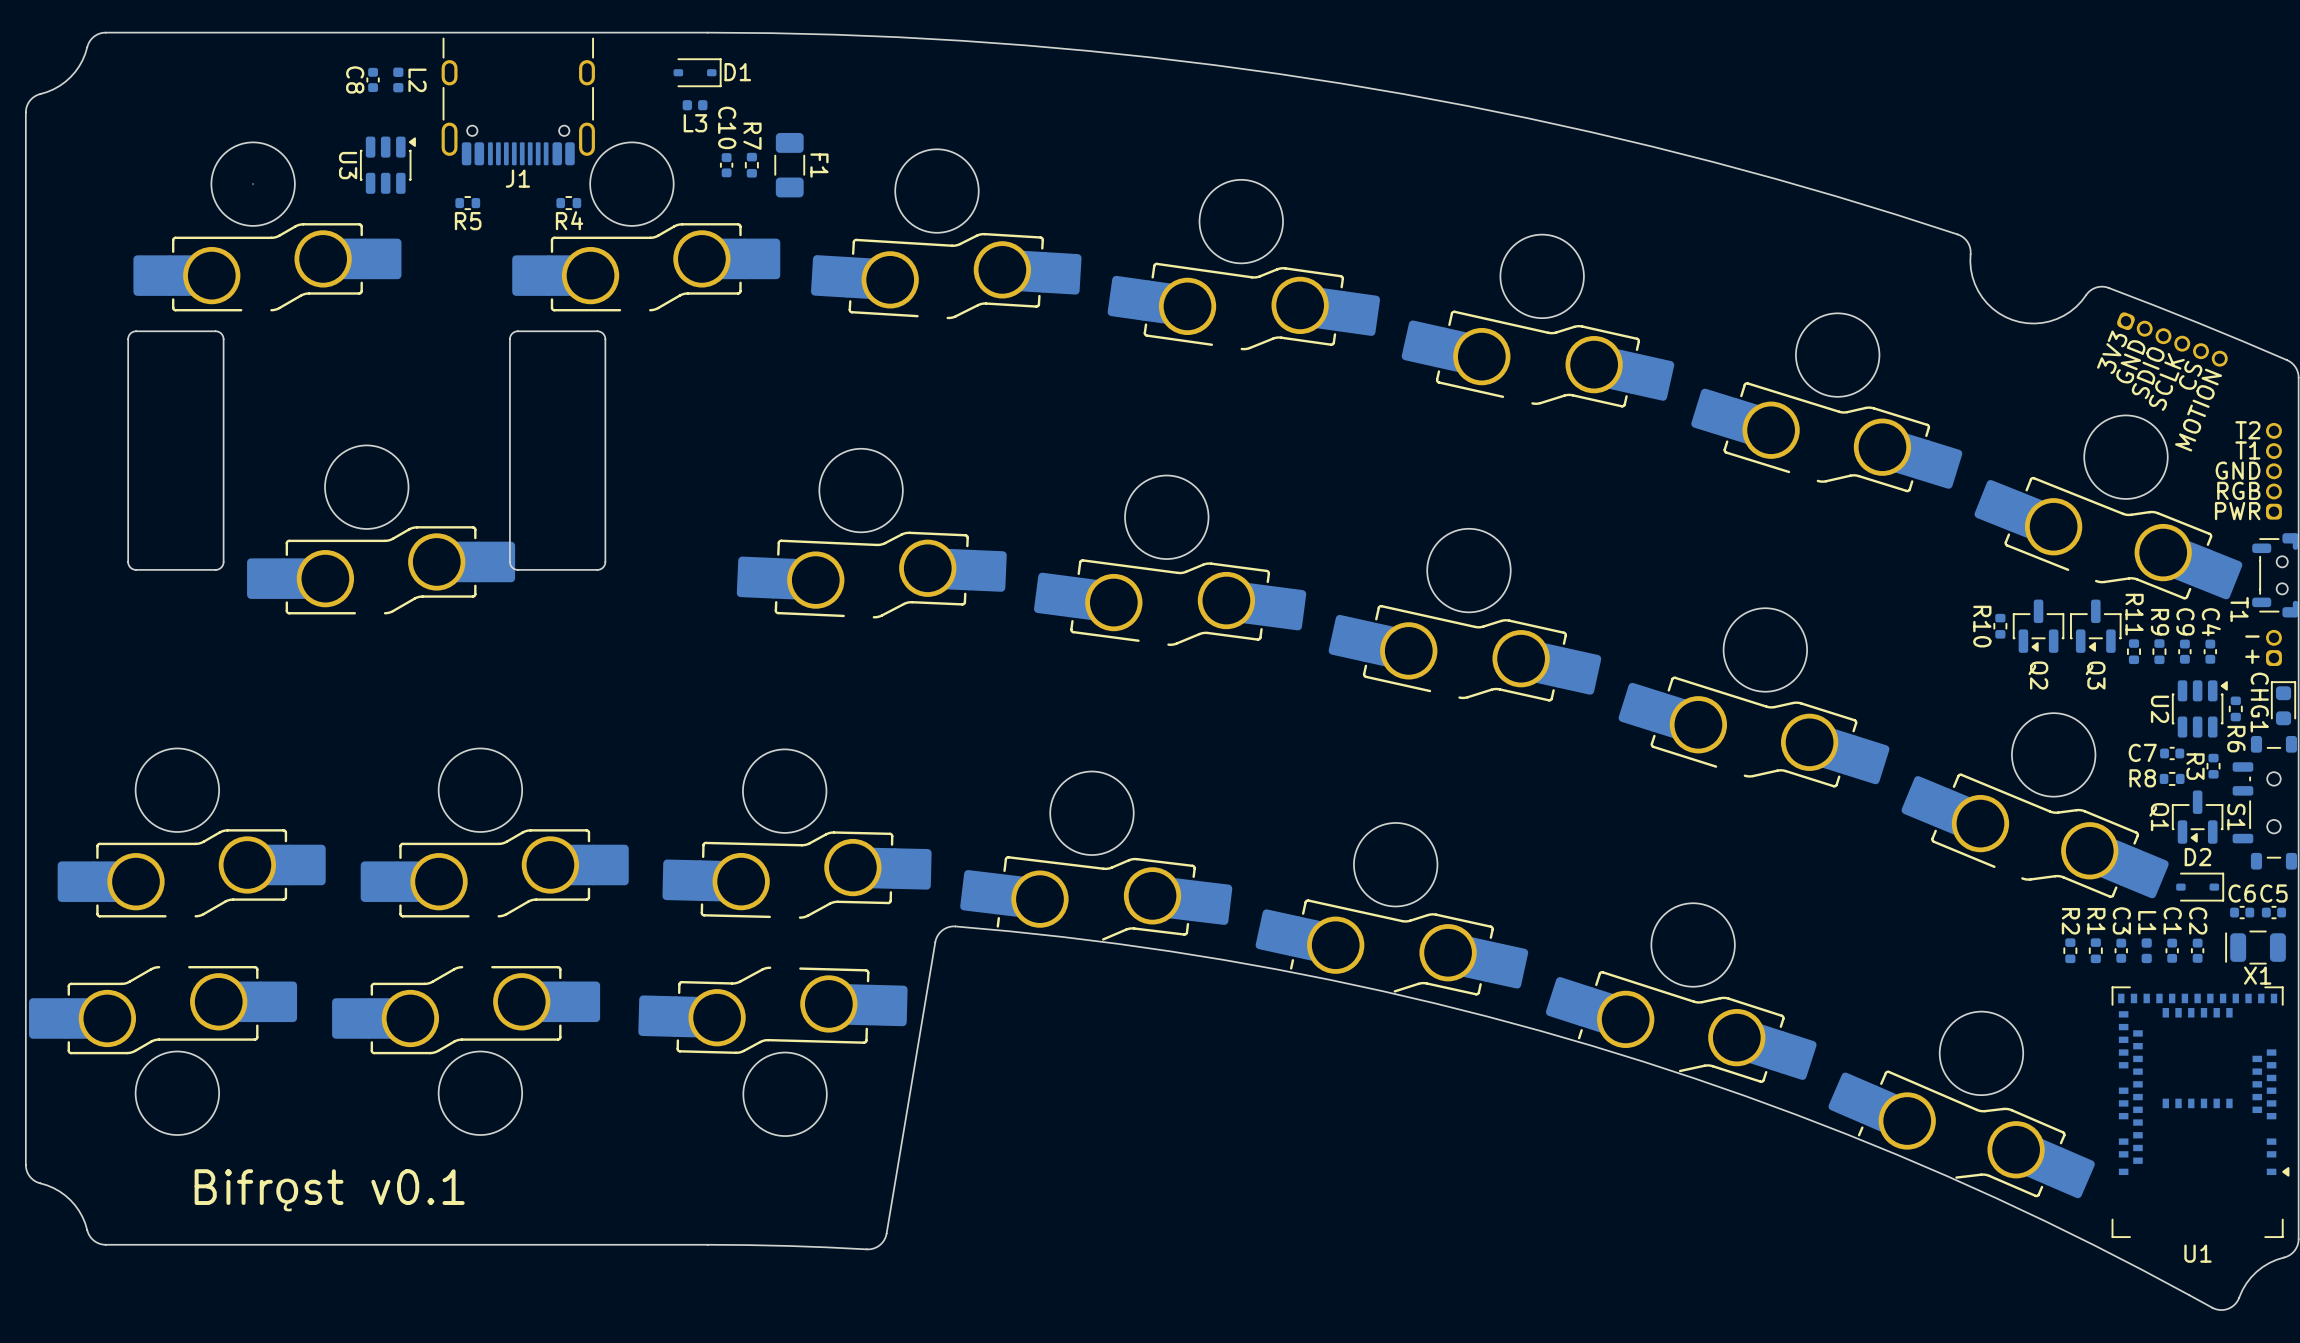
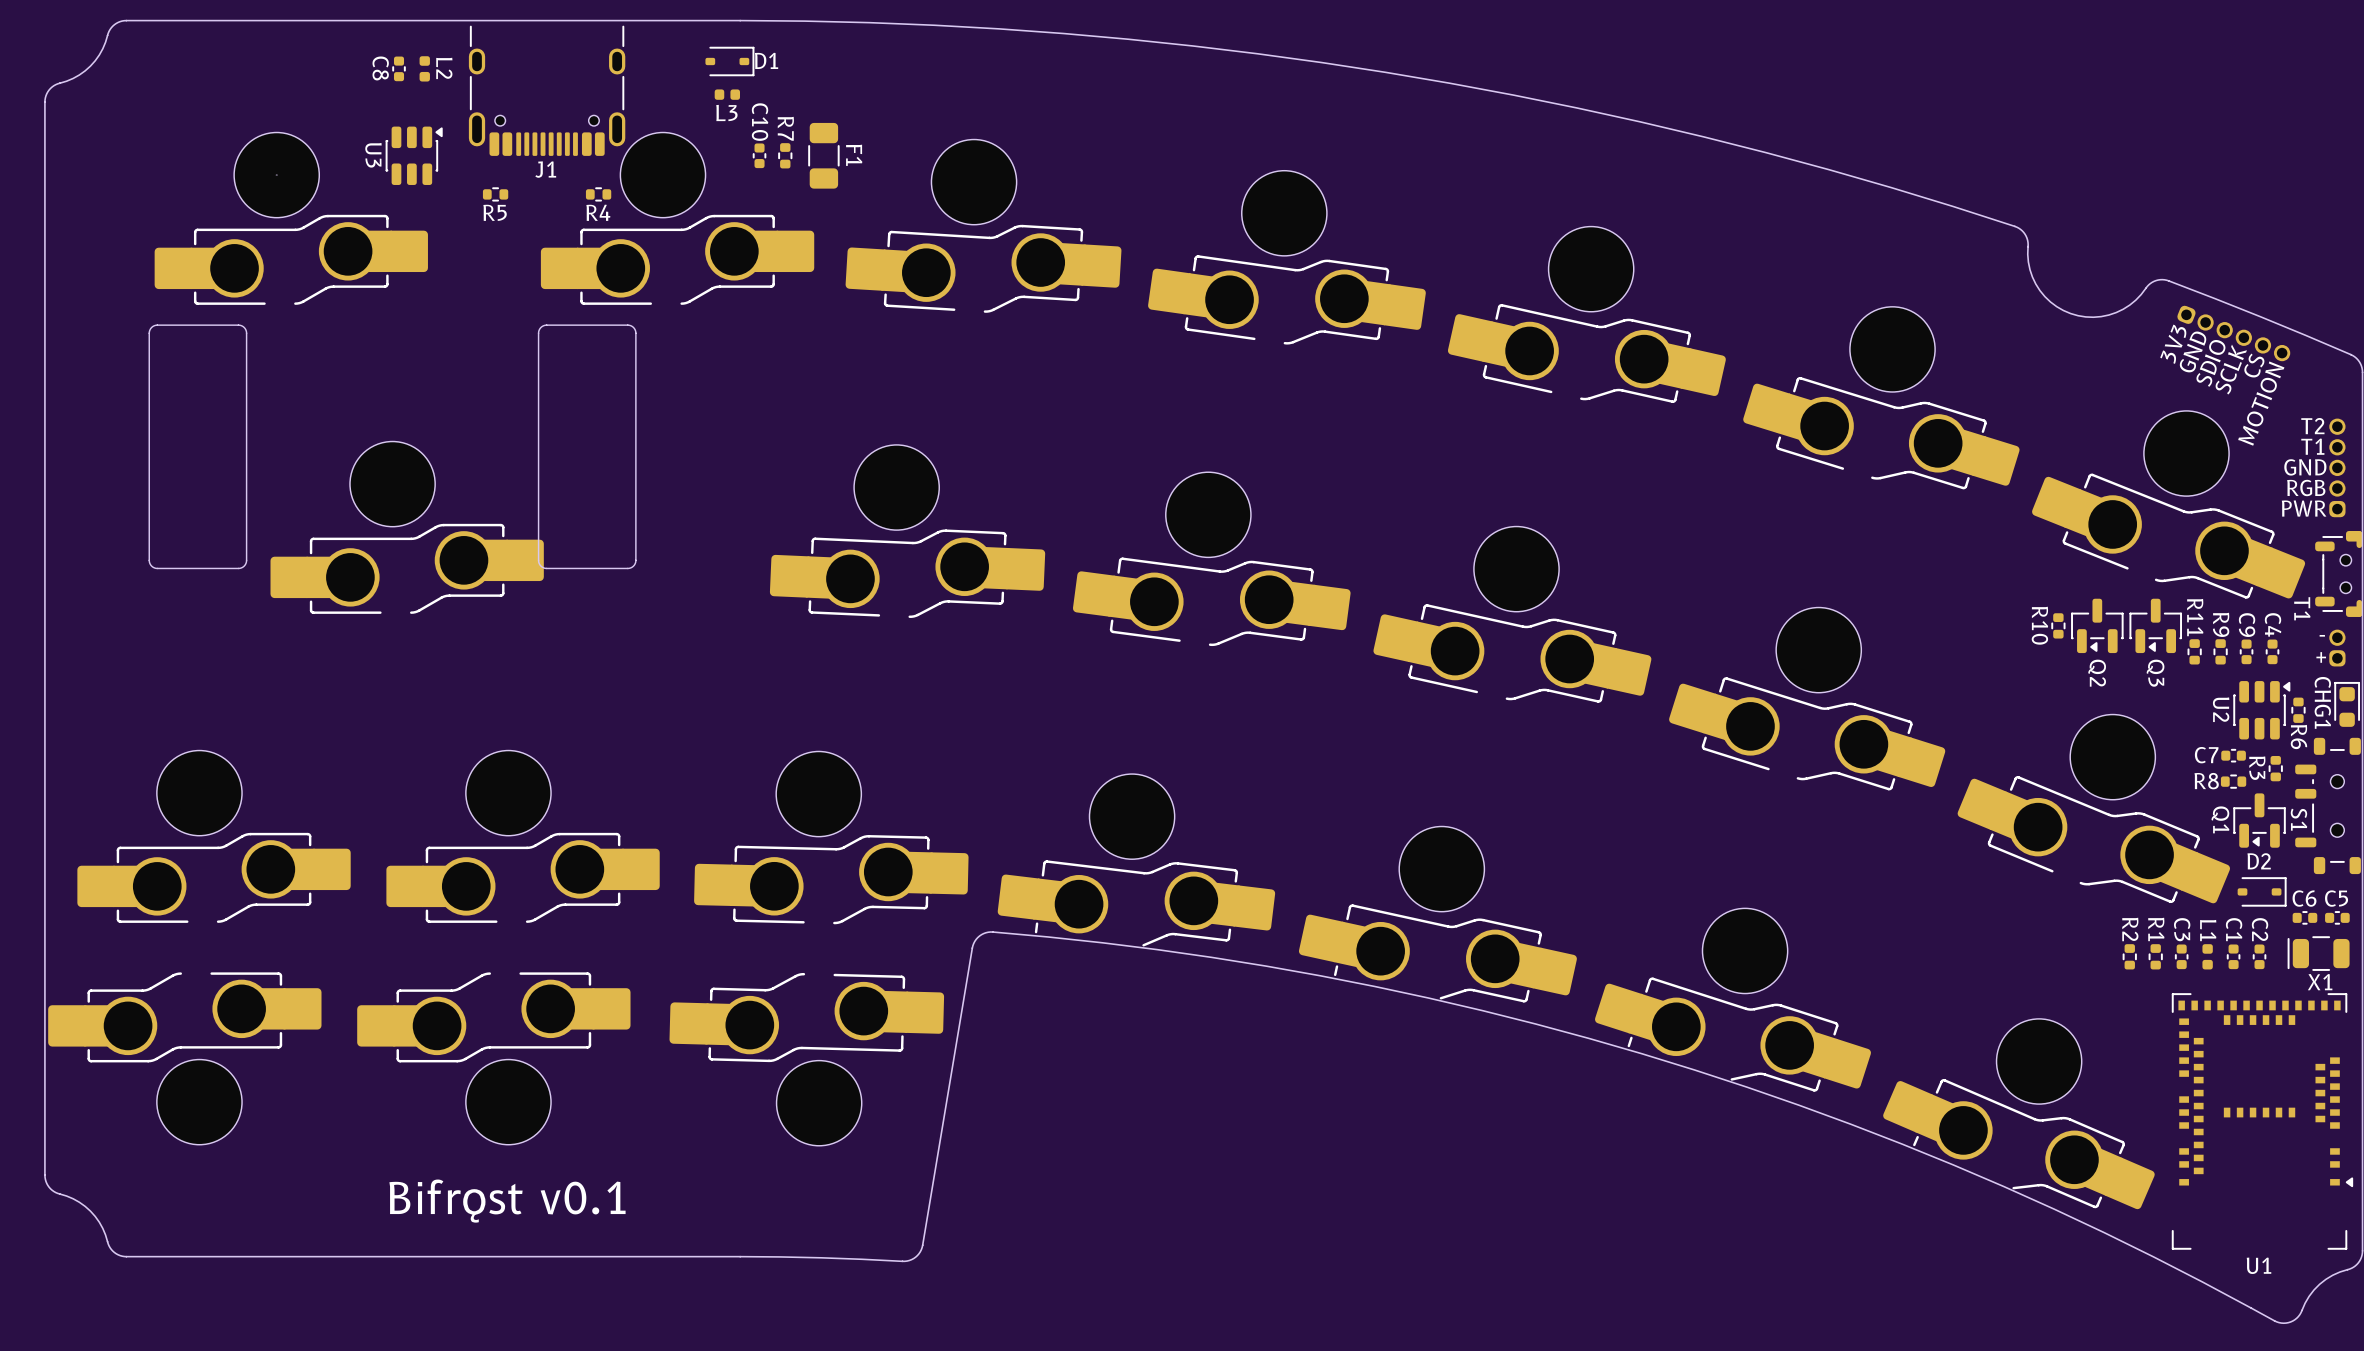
text position: Bifrǫst v0.1 (329, 1191) -> Bifrǫst v0.1 (507, 1201)

